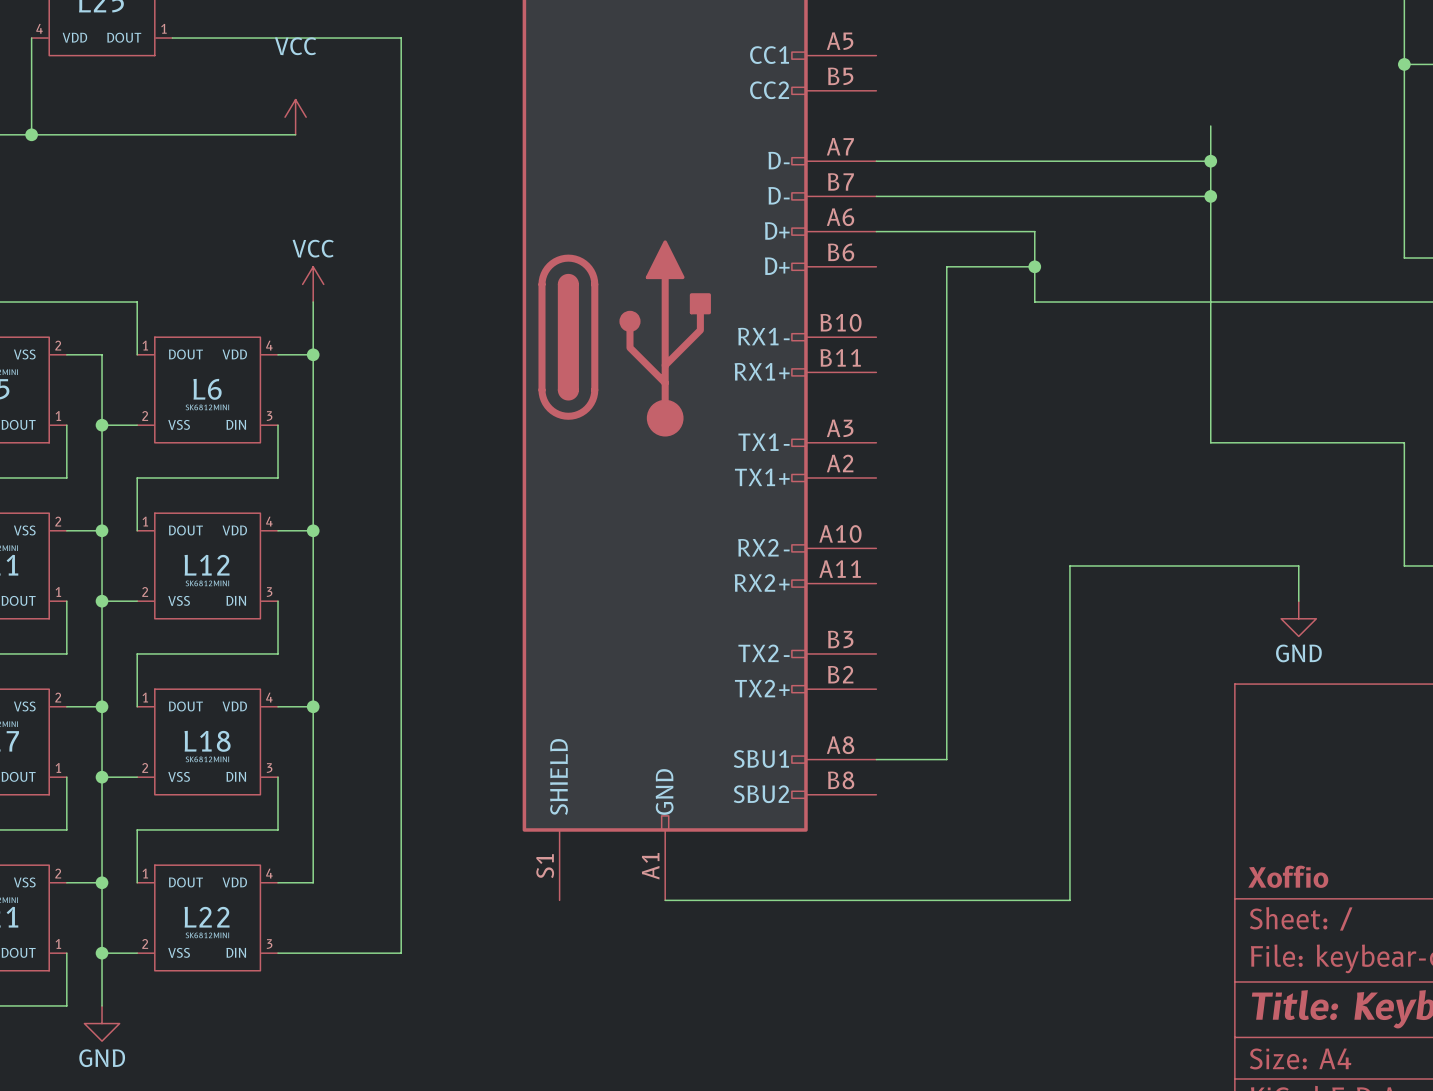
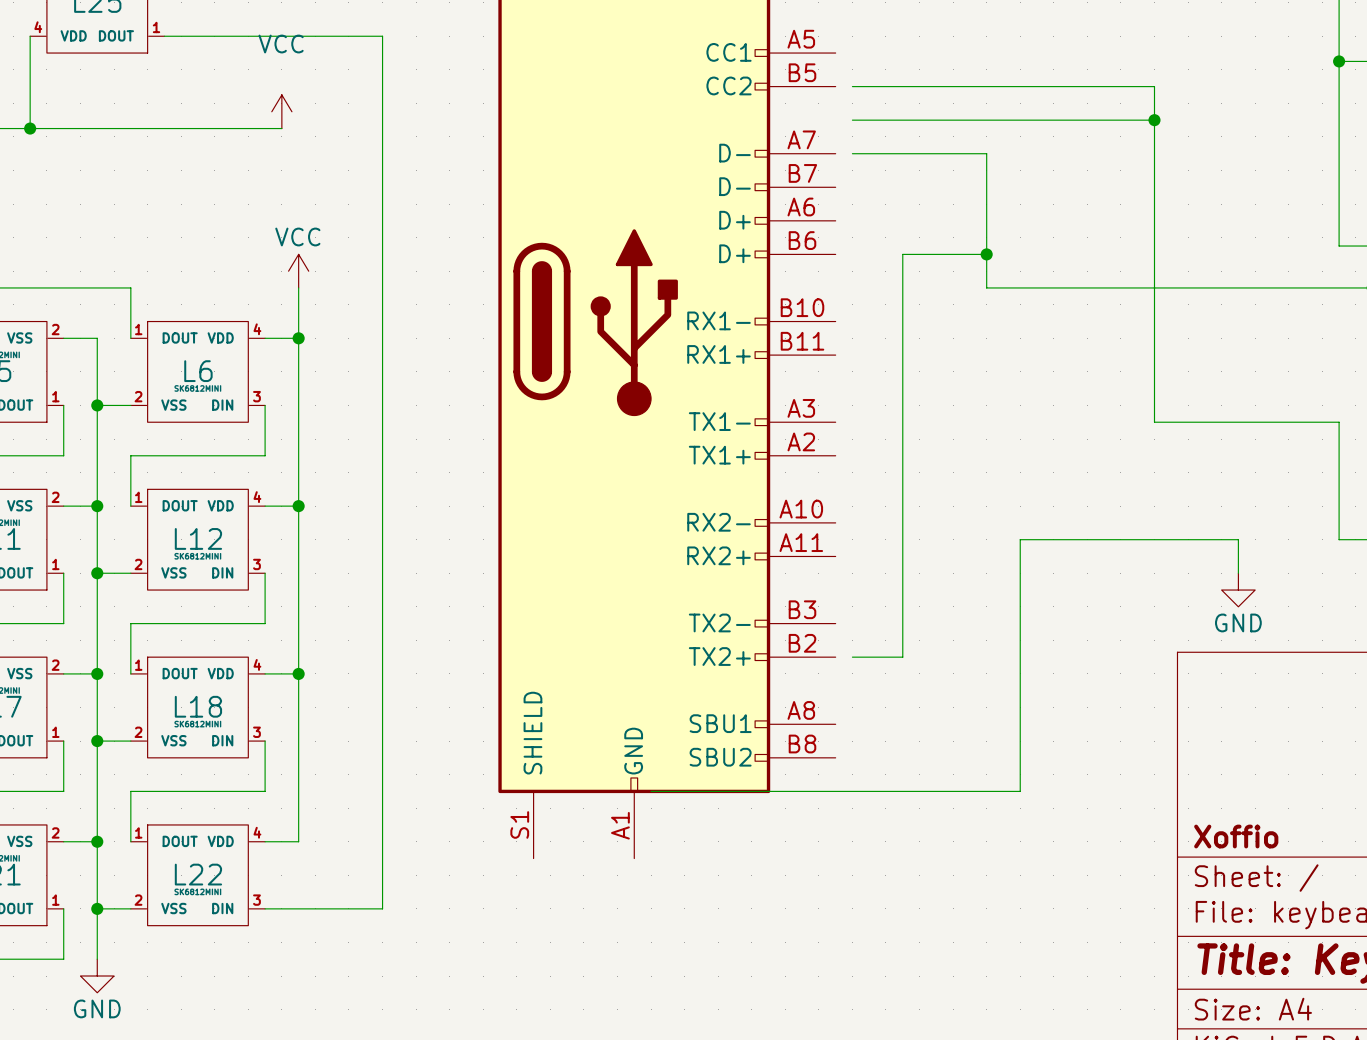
wire: none -> (852, 86) (1154, 86) (1154, 120) (852, 120)
junction: none -> (1154, 120)
wire: (876, 161) (893, 161) -> none
wire: (1034, 161) (1210, 161) -> none
junction: (1210, 161) -> none
wire: (876, 196) (1210, 196) -> none
junction: (1210, 196) -> none
wire: (876, 231) (1034, 231) -> (986, 153) (986, 220)
wire: (946, 689) (946, 759) (876, 759) -> (902, 657) (852, 657)
wire: (1069, 829) (1069, 900) (665, 900) -> (1020, 791) (651, 791)

